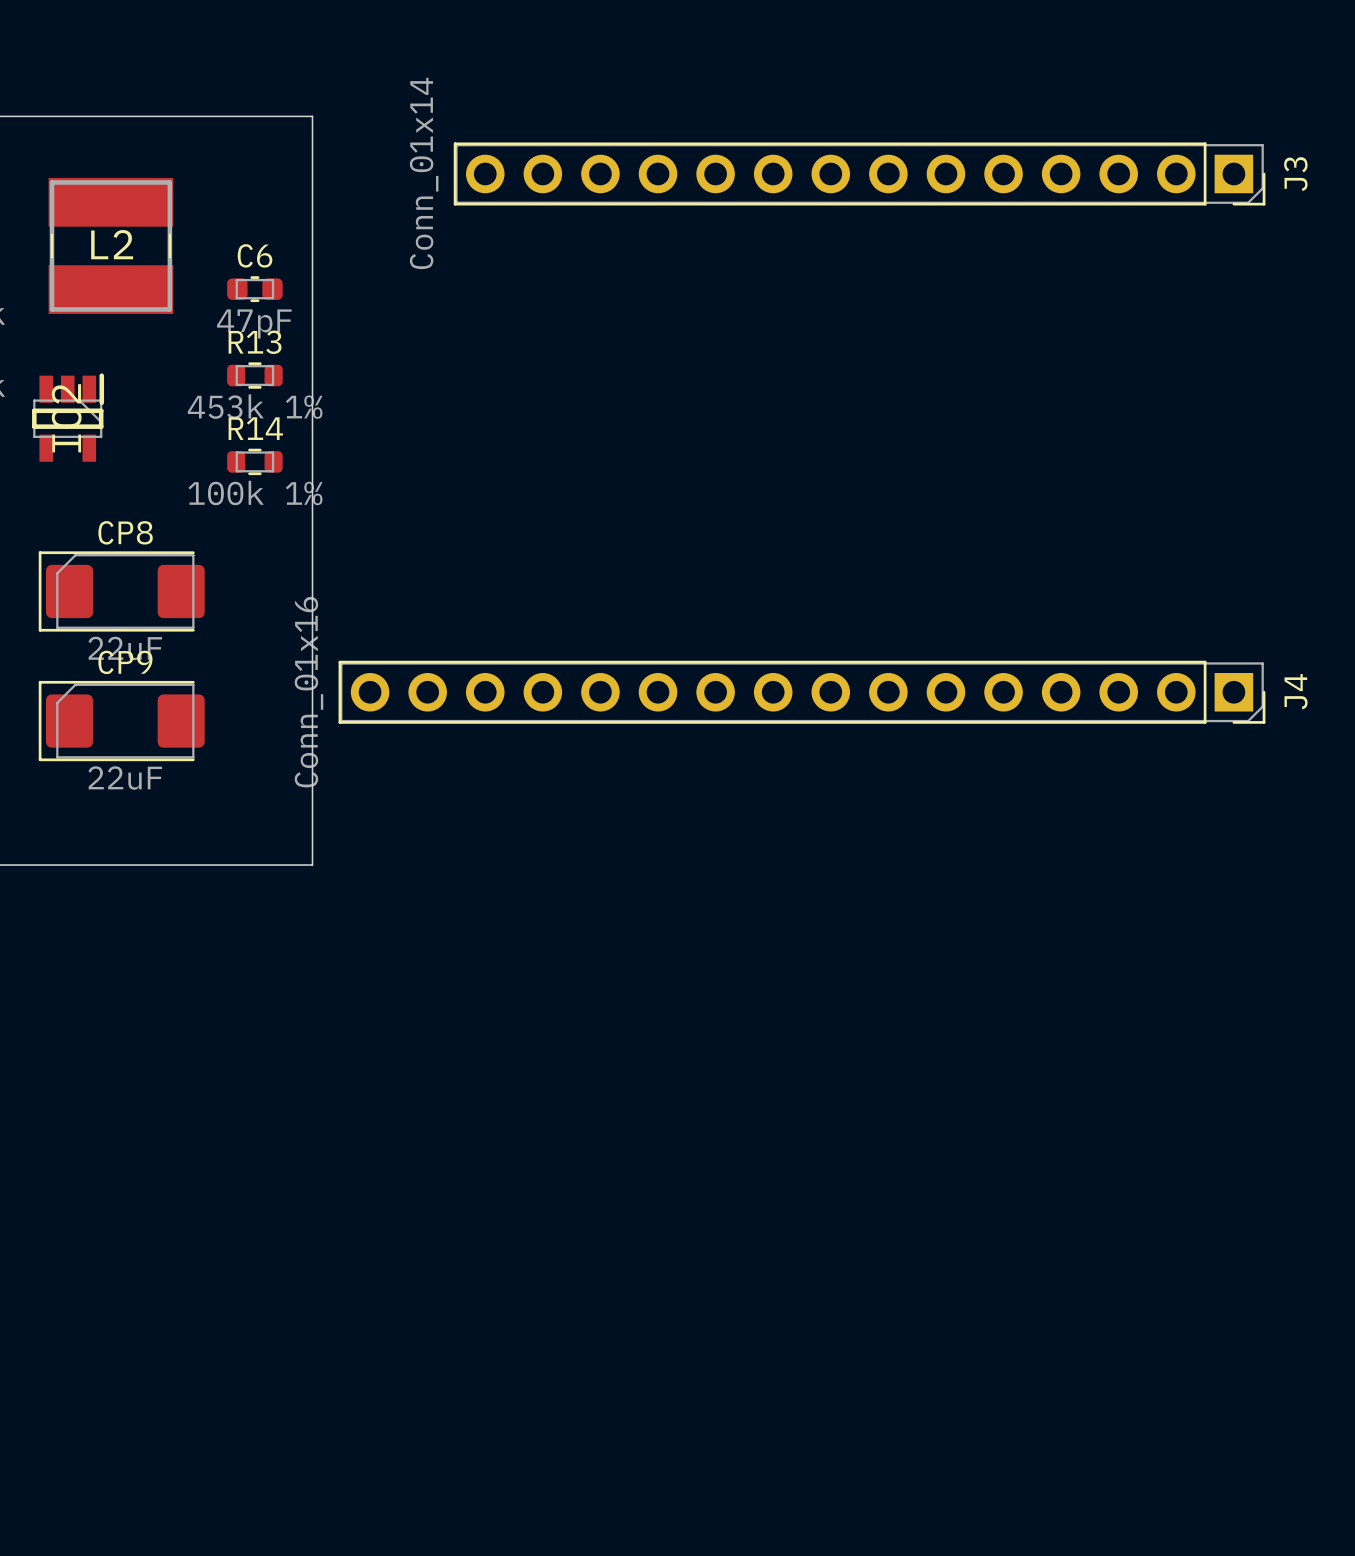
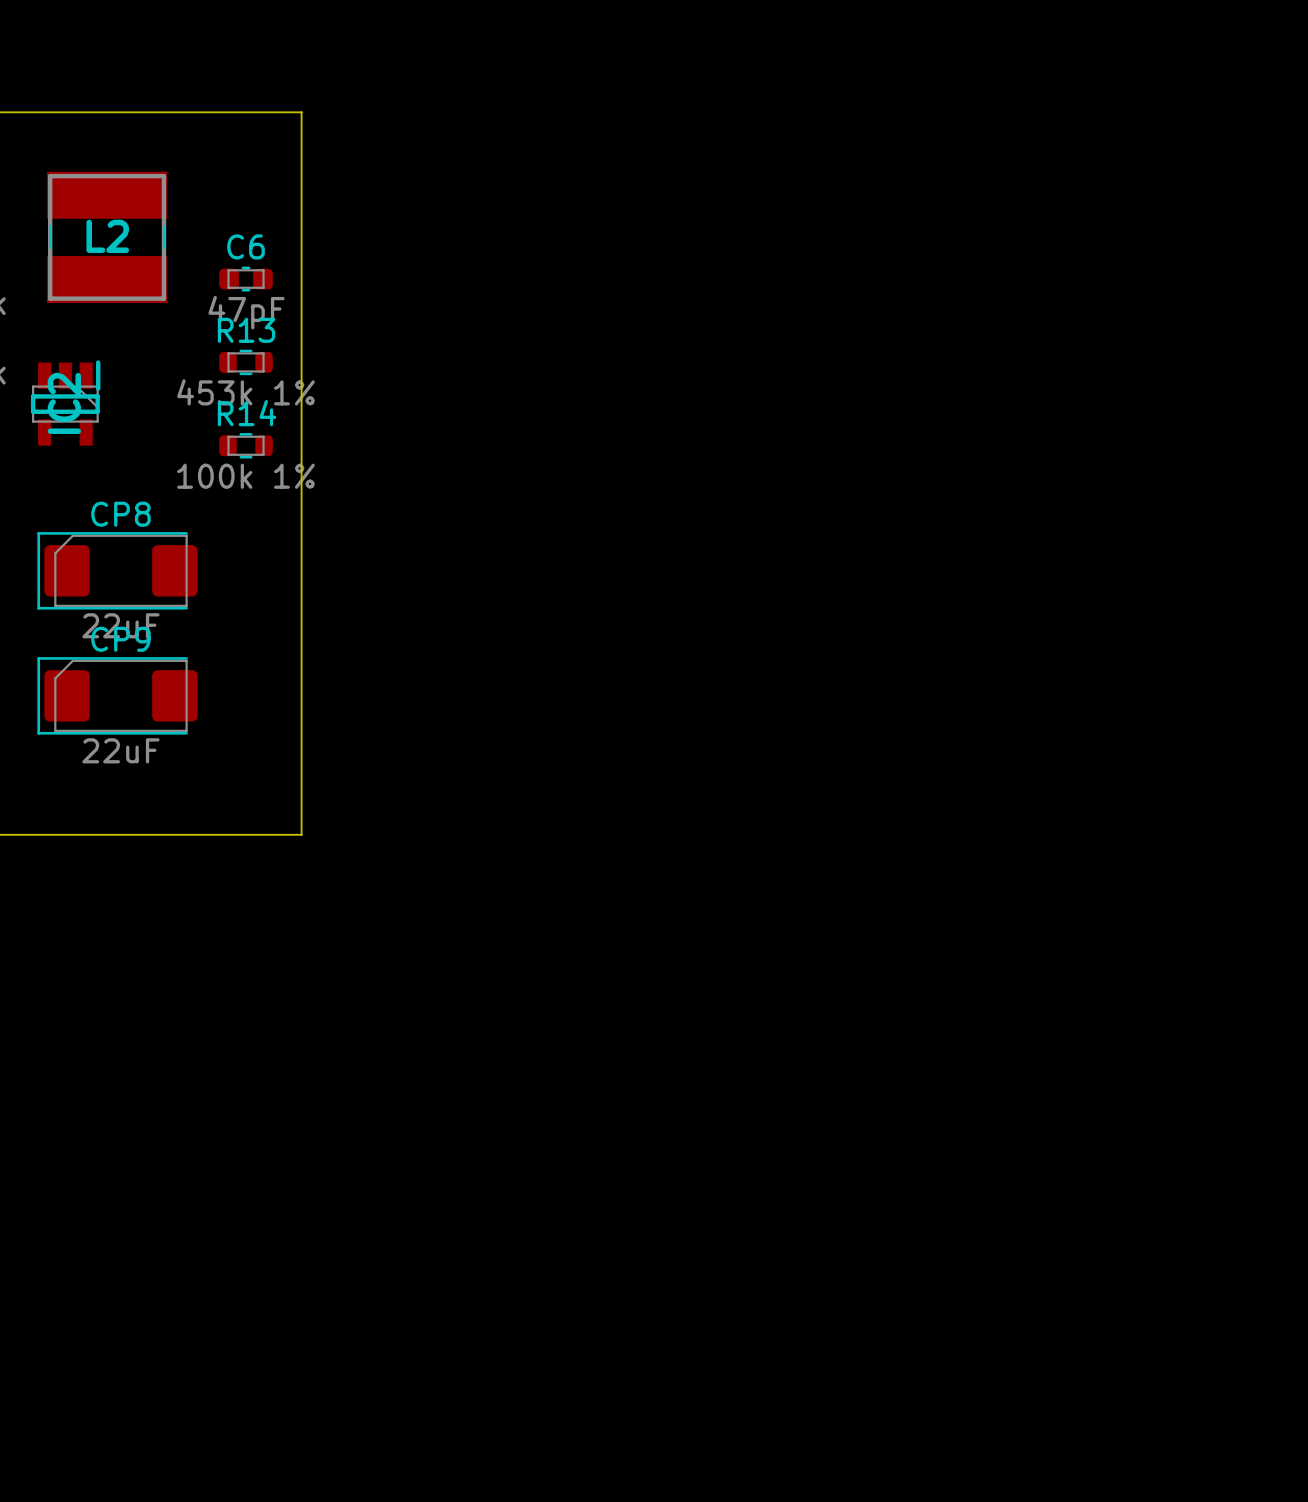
J3: Conn_01x14 (859, 173) -> none
J4: Conn_01x16 (801, 692) -> none

